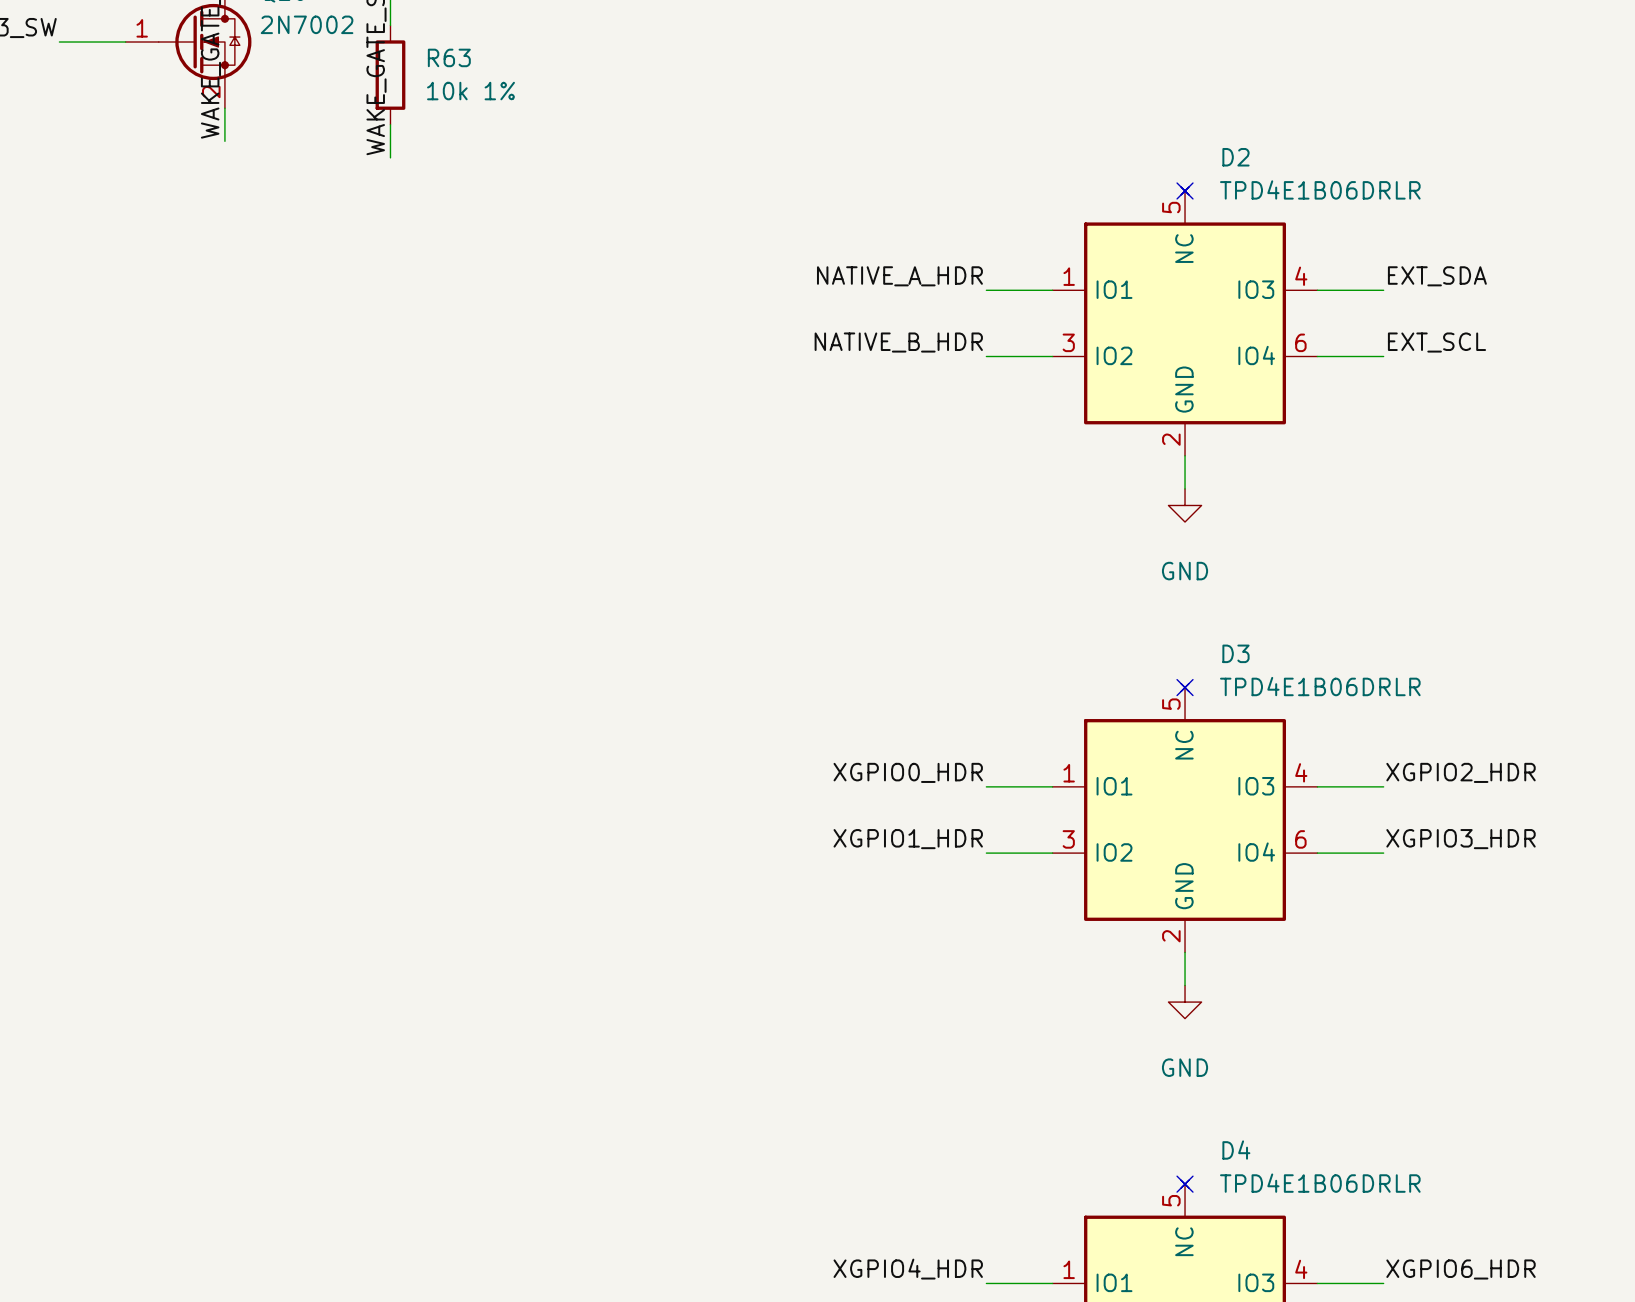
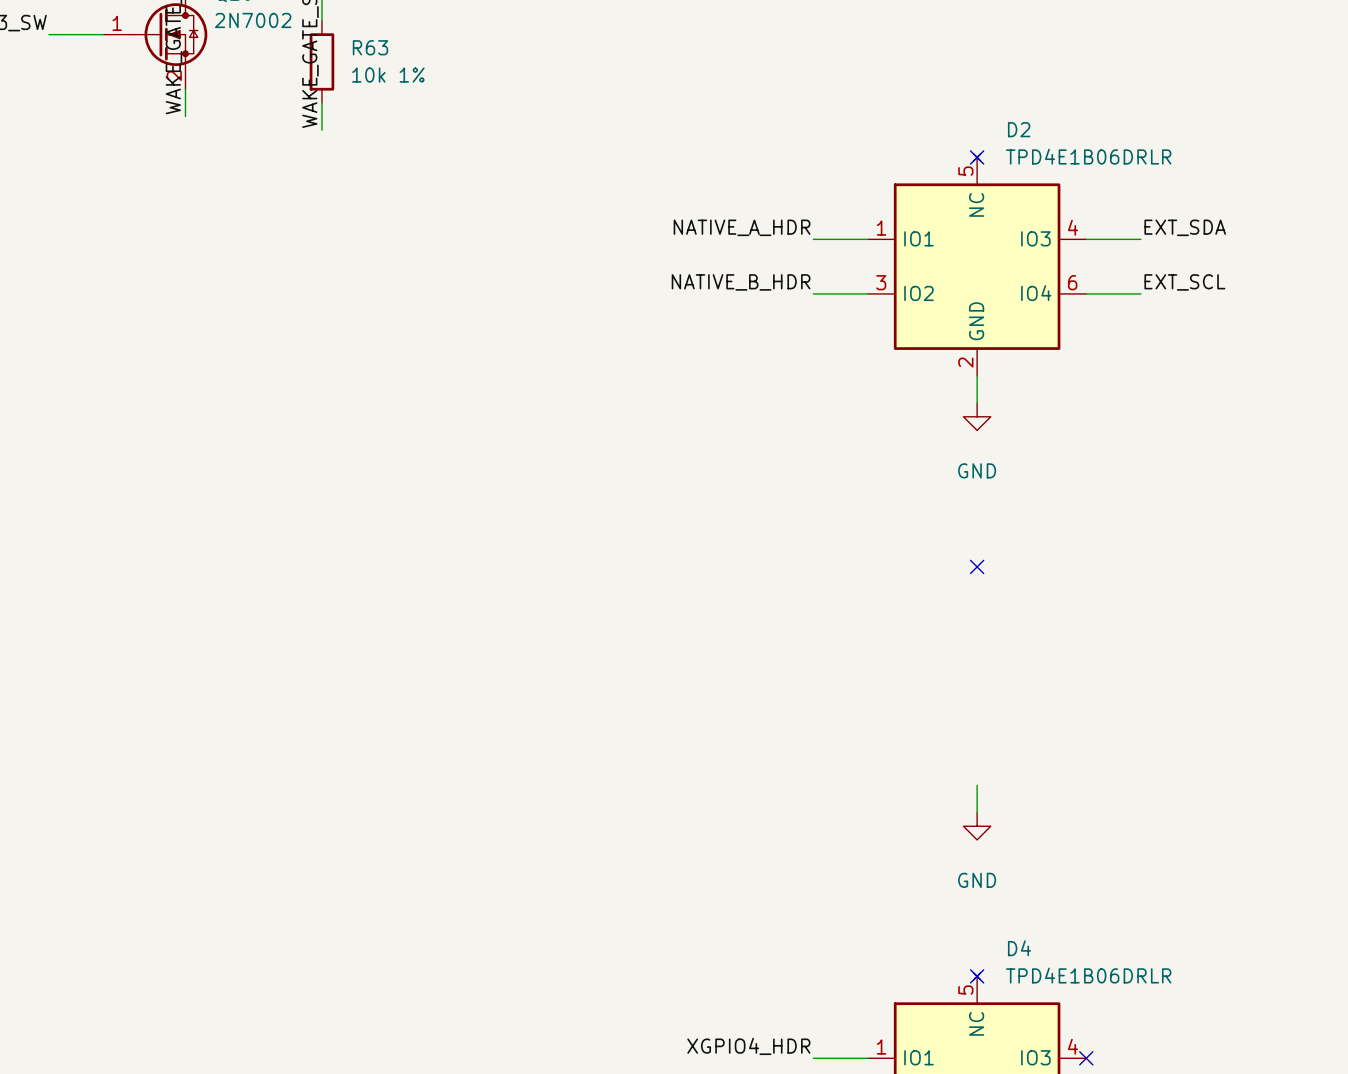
label: XGPIO0_HDR (908, 772) -> none
label: XGPIO2_HDR (1461, 772) -> none
wire: (986, 786) (1052, 786) -> none
wire: (1317, 786) (1383, 786) -> none
D3: TPD4E1B06DRLR (1185, 818) -> none
label: XGPIO1_HDR (908, 839) -> none
label: XGPIO3_HDR (1461, 839) -> none
wire: (986, 853) (1052, 853) -> none
wire: (1317, 853) (1383, 853) -> none
label: XGPIO6_HDR (1461, 1269) -> none
wire: (1317, 1283) (1383, 1283) -> none
no-connect mark: none -> (1086, 1058)

